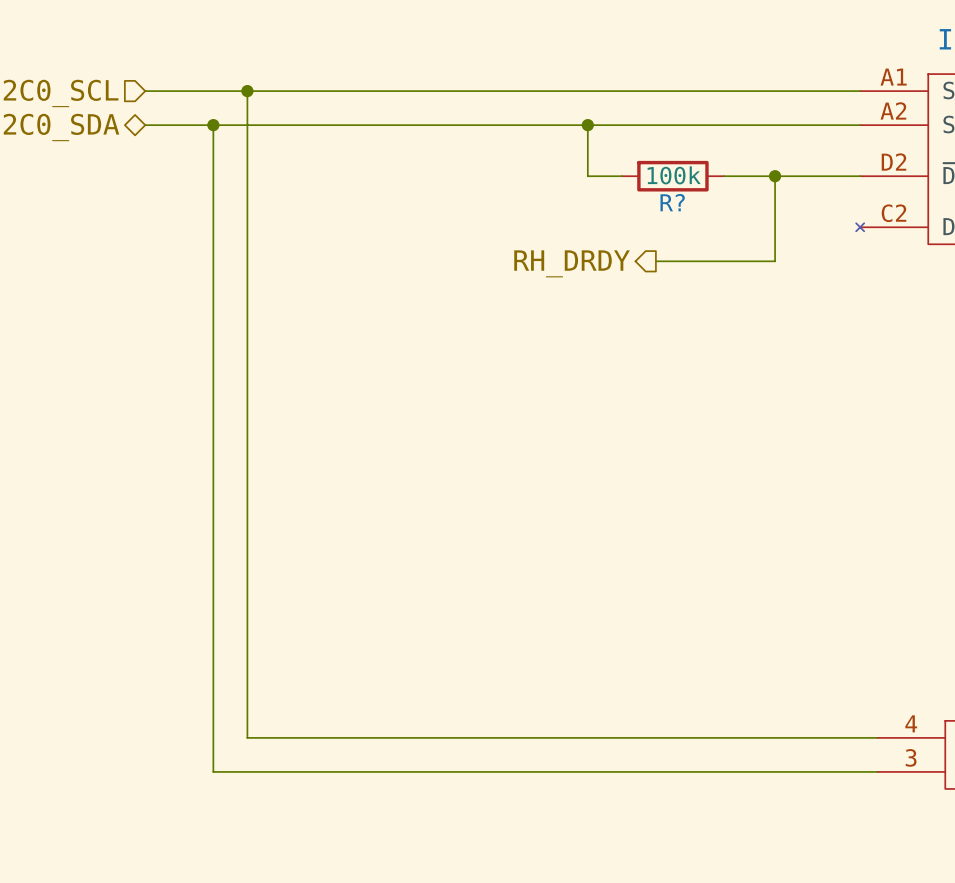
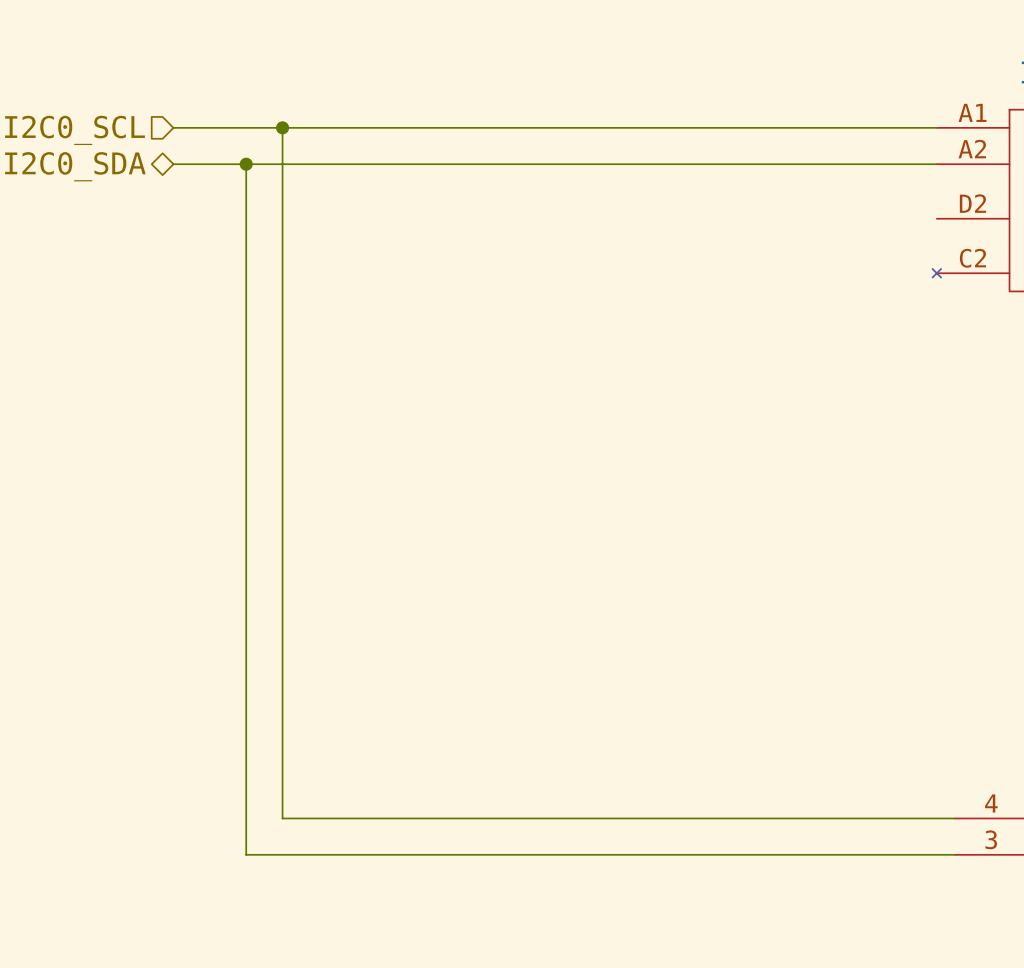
wire: (587, 125) (587, 176) (621, 176) -> none
junction: (587, 125) -> none
R?: 100k (672, 176) -> none
wire: (724, 176) (860, 176) -> none
wire: (775, 176) (775, 261) (655, 261) -> none
junction: (775, 176) -> none
hierarchical label: RH_DRDY (572, 263) -> none

